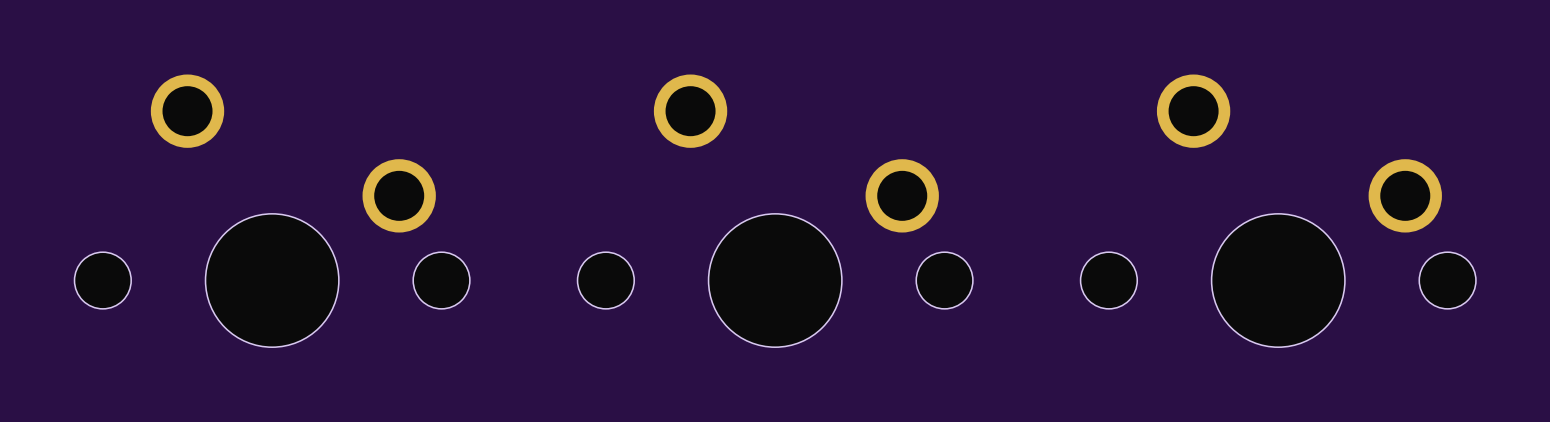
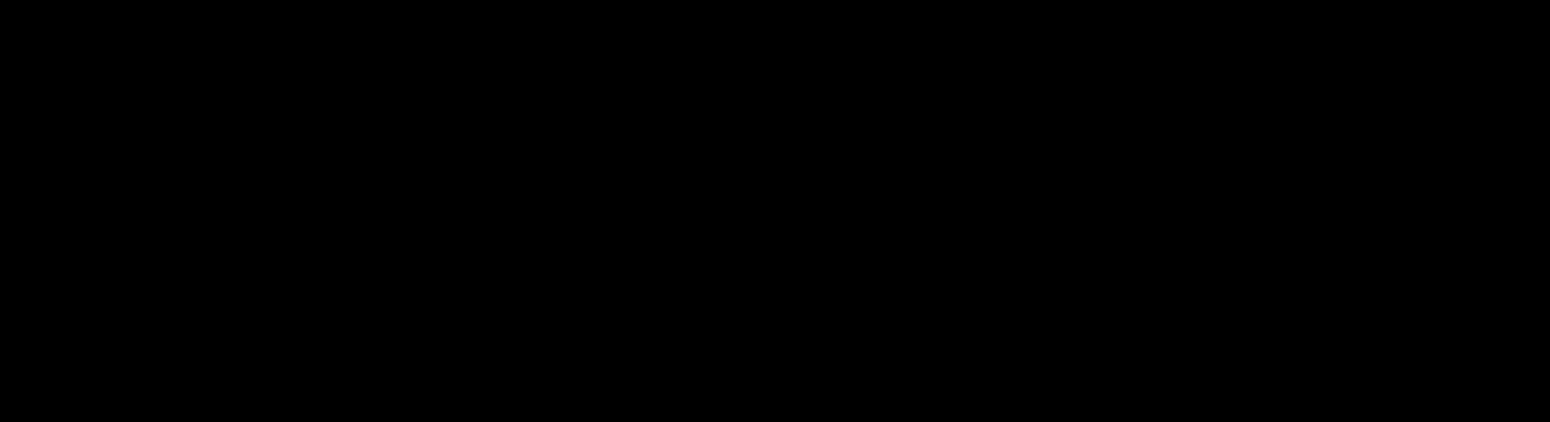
part: (272, 210) -> none
part: (775, 210) -> none
part: (1278, 210) -> none

